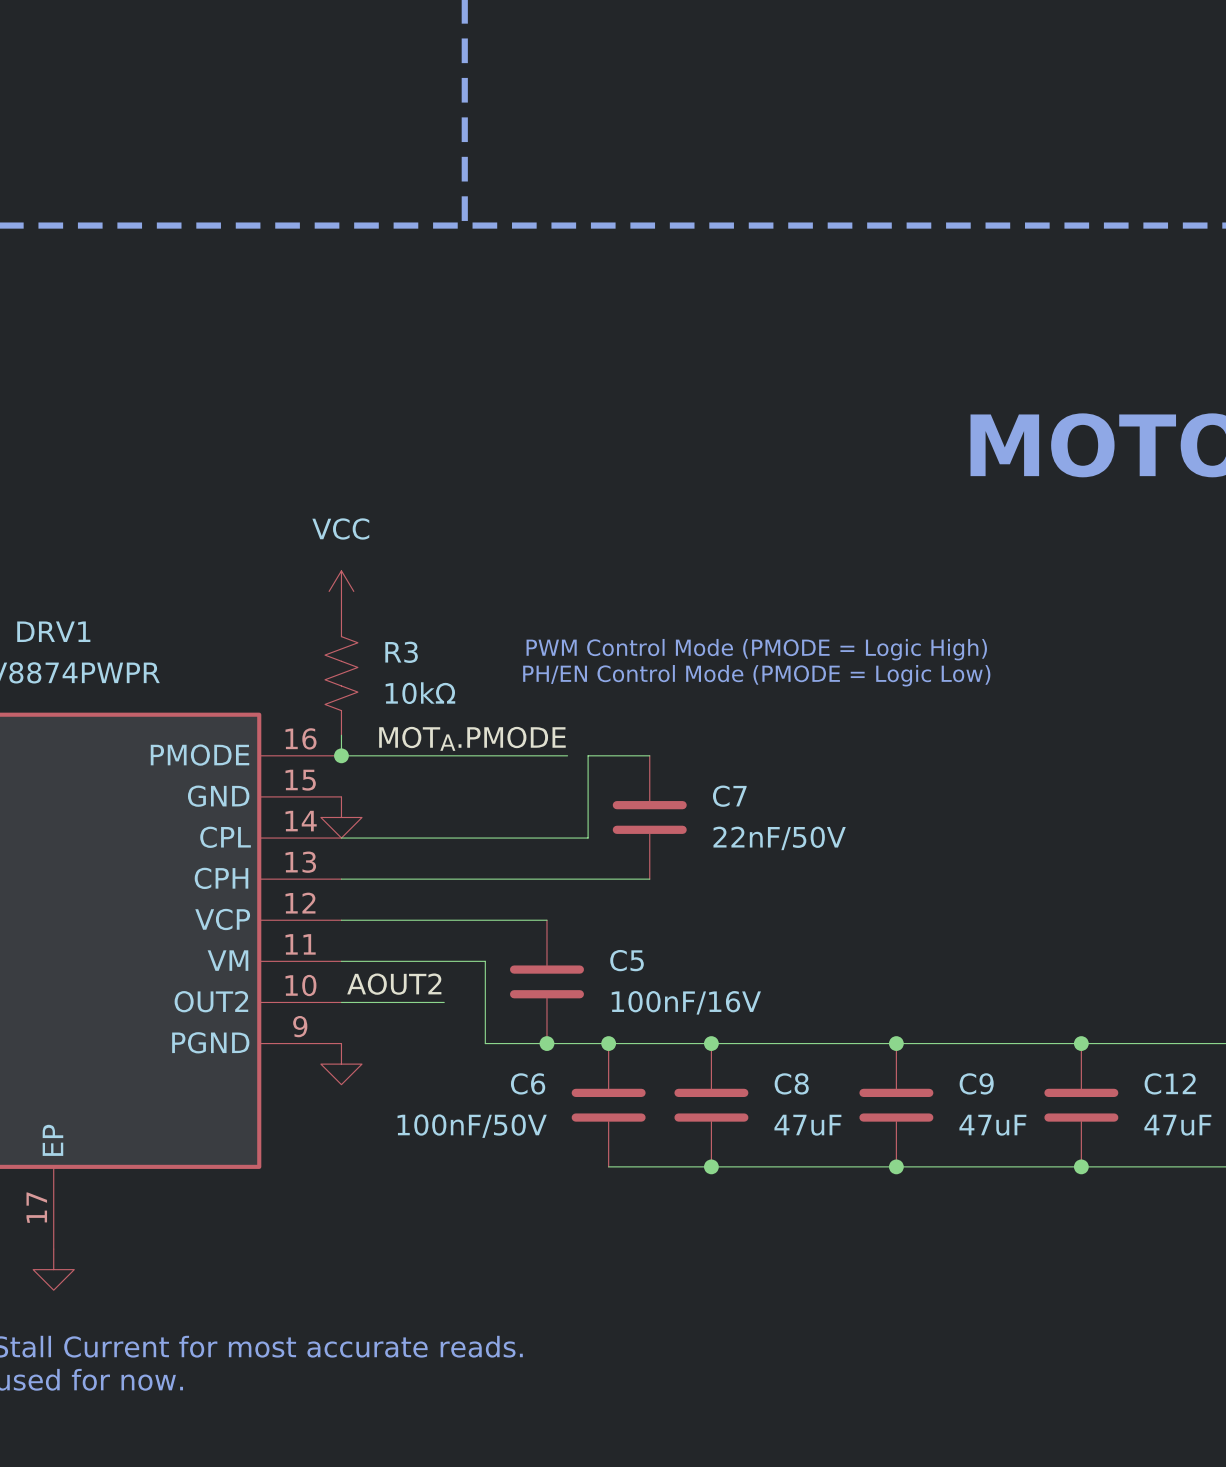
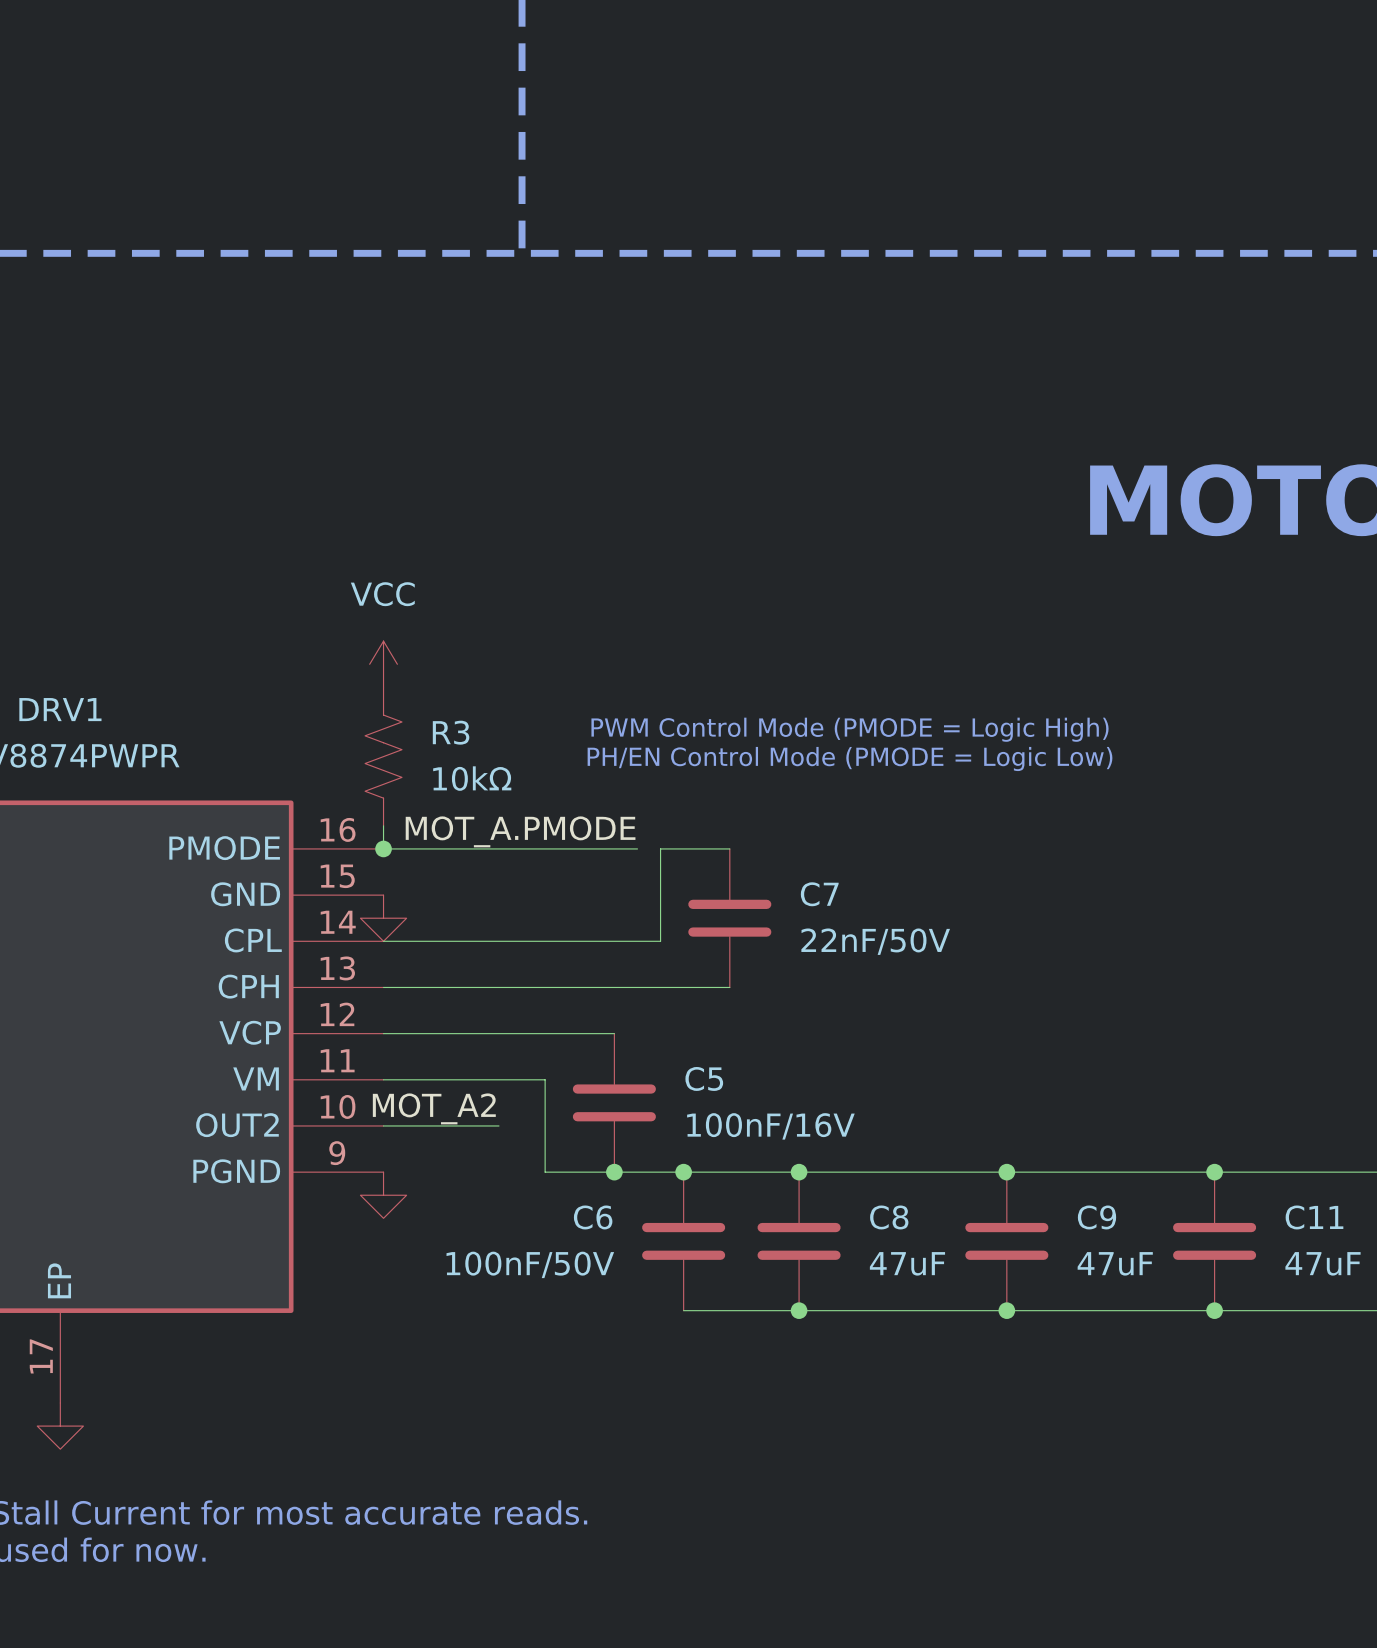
label: MOTA.PMODE (472, 738) -> MOT_A.PMODE (520, 831)
label: AOUT2 (394, 984) -> MOT_A2 (434, 1108)
C12 name: C12 (1170, 1083) -> C11 (1314, 1217)

